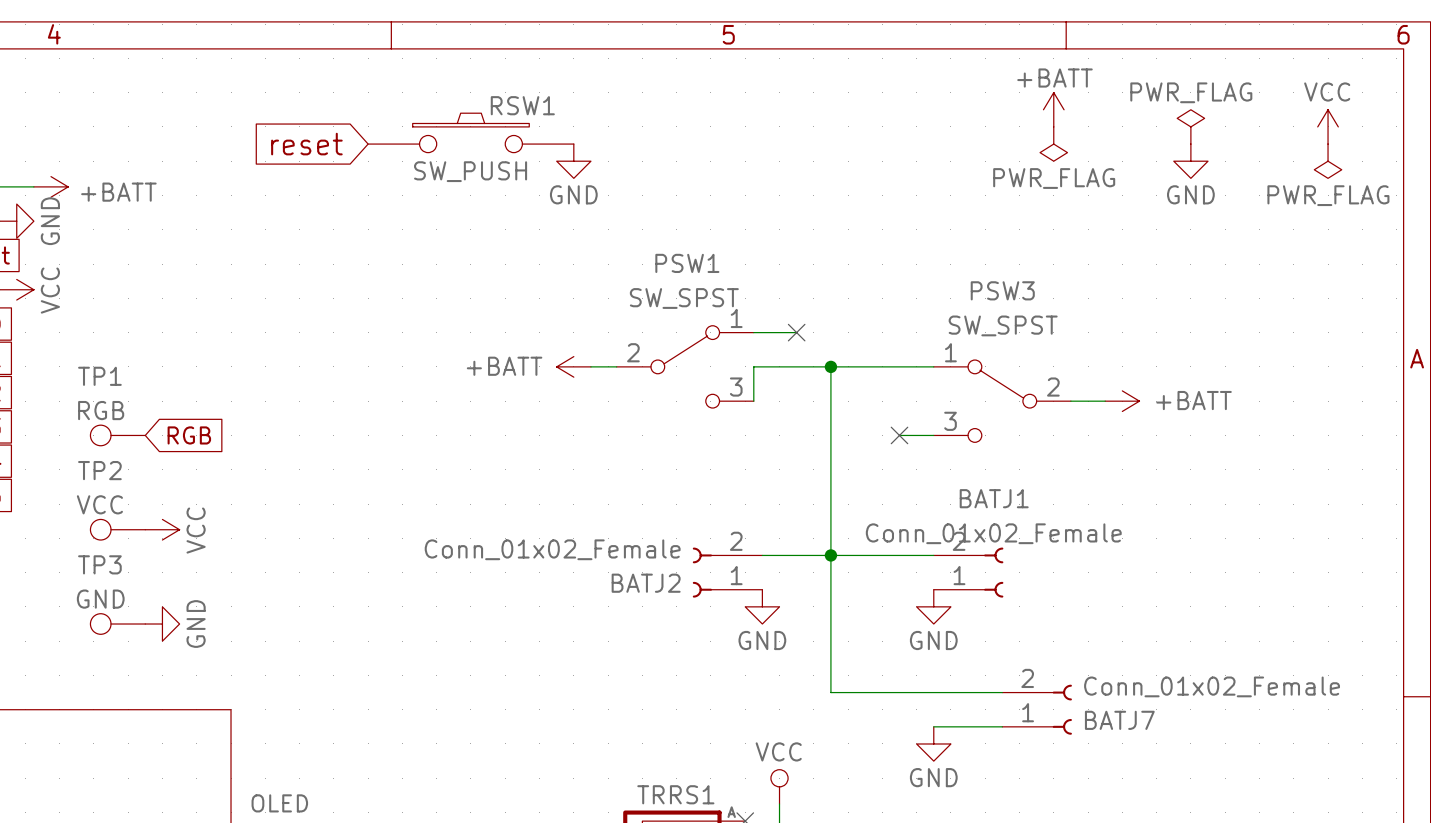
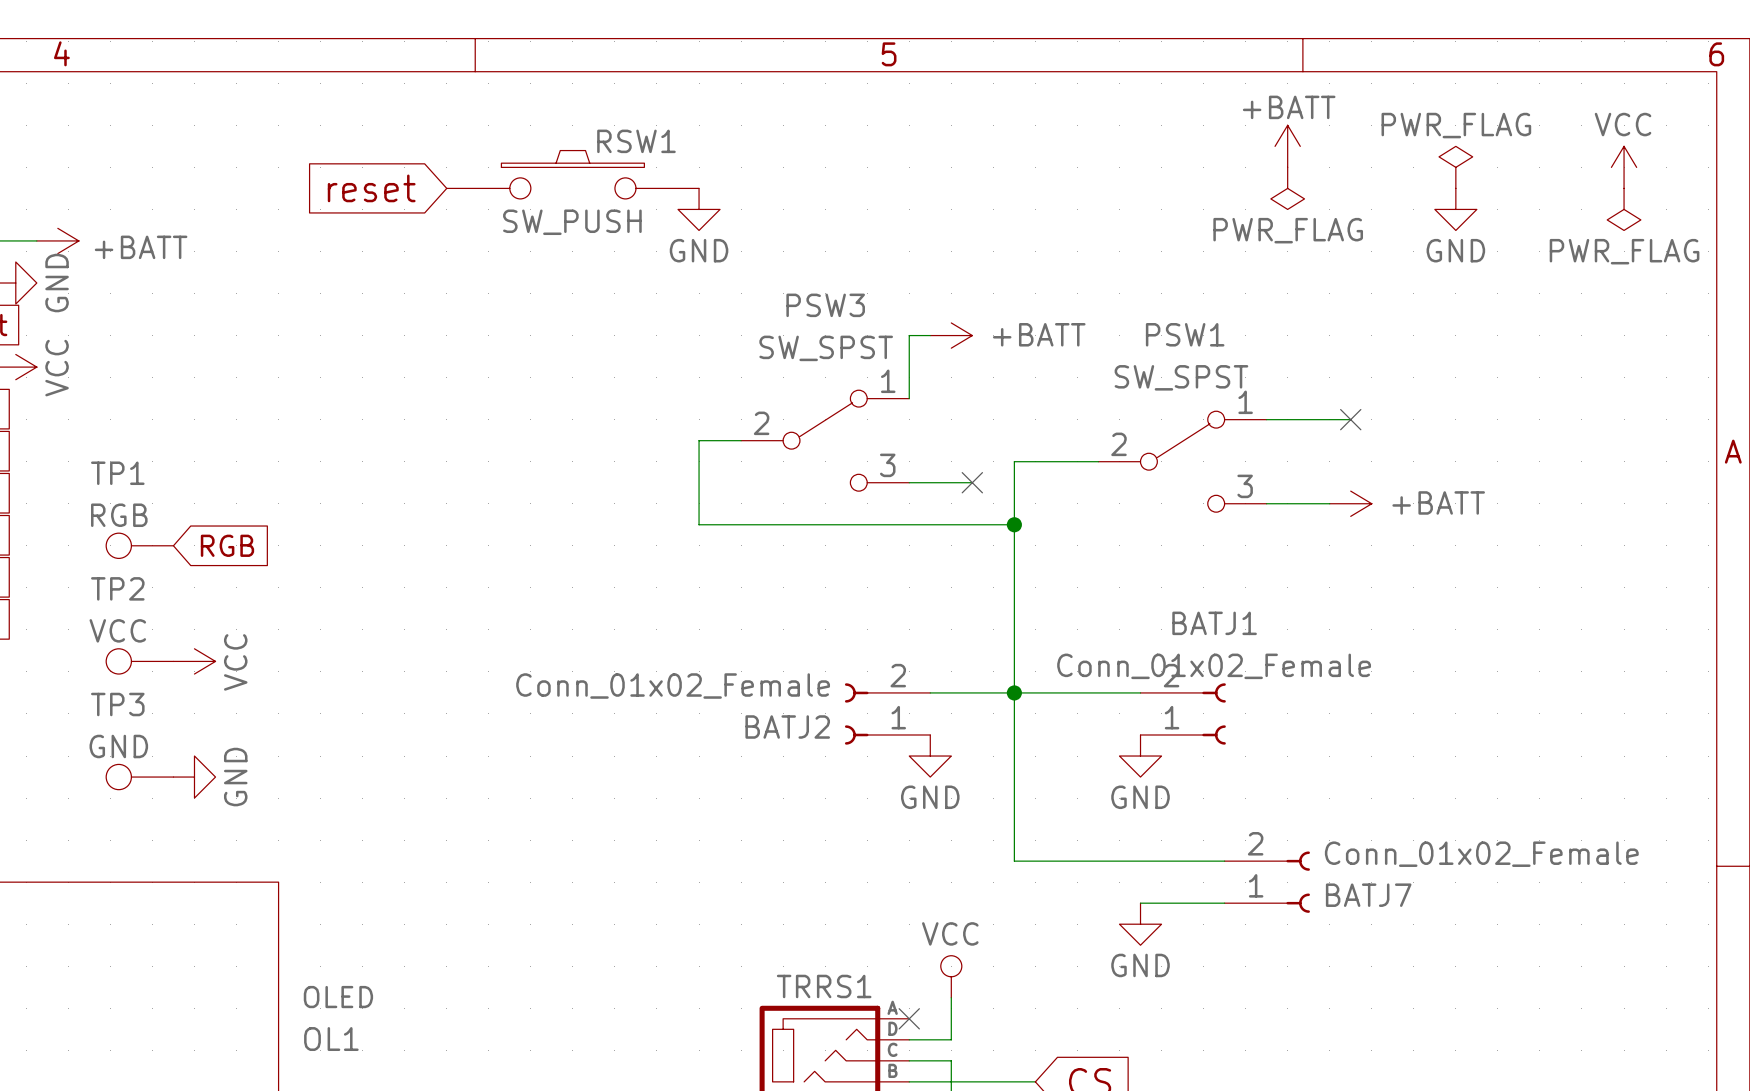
wire: none -> (930, 335) (909, 335) (909, 398)
power symbol: none -> +BATT (951, 335)
wire: (753, 332) (796, 332) -> none
no-connect mark position: (796, 332) -> (972, 482)
wire: none -> (1266, 419) (1350, 419)
no-connect mark: none -> (1350, 419)
wire: none -> (741, 440) (699, 440) (699, 524) (1014, 524)
power symbol: +BATT (573, 366) -> none
wire: (590, 366) (616, 366) -> none
PSW1 position: (685, 366) -> (1182, 461)
wire: (830, 366) (753, 366) (753, 401) -> none
junction position: (830, 366) -> (1014, 524)
wire: none -> (909, 482) (972, 482)
PSW3 flip: as is (1002, 401) -> left-right (825, 440)
PSW3 position: (1002, 401) -> (825, 440)
power symbol position: +BATT (1122, 401) -> +BATT (1350, 503)
wire: (899, 435) (933, 435) -> none
no-connect mark: (899, 435) -> none

